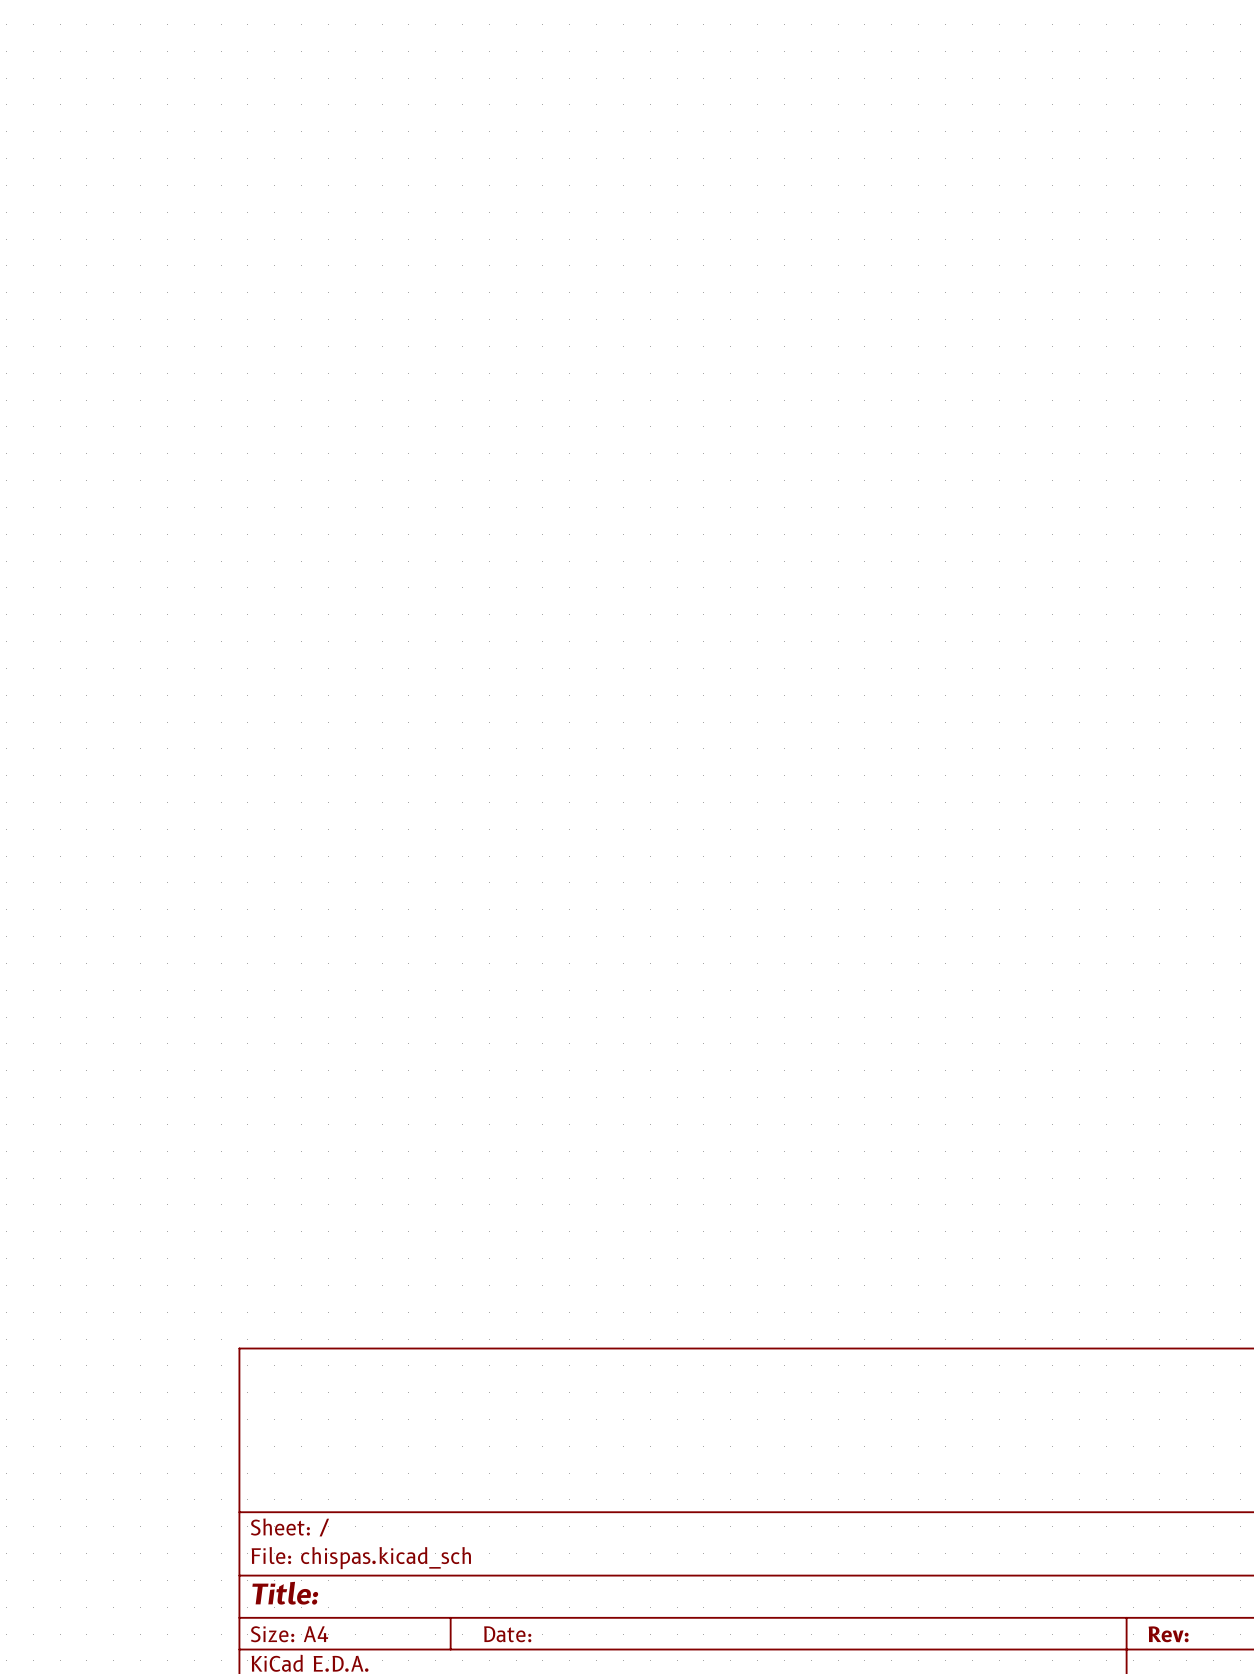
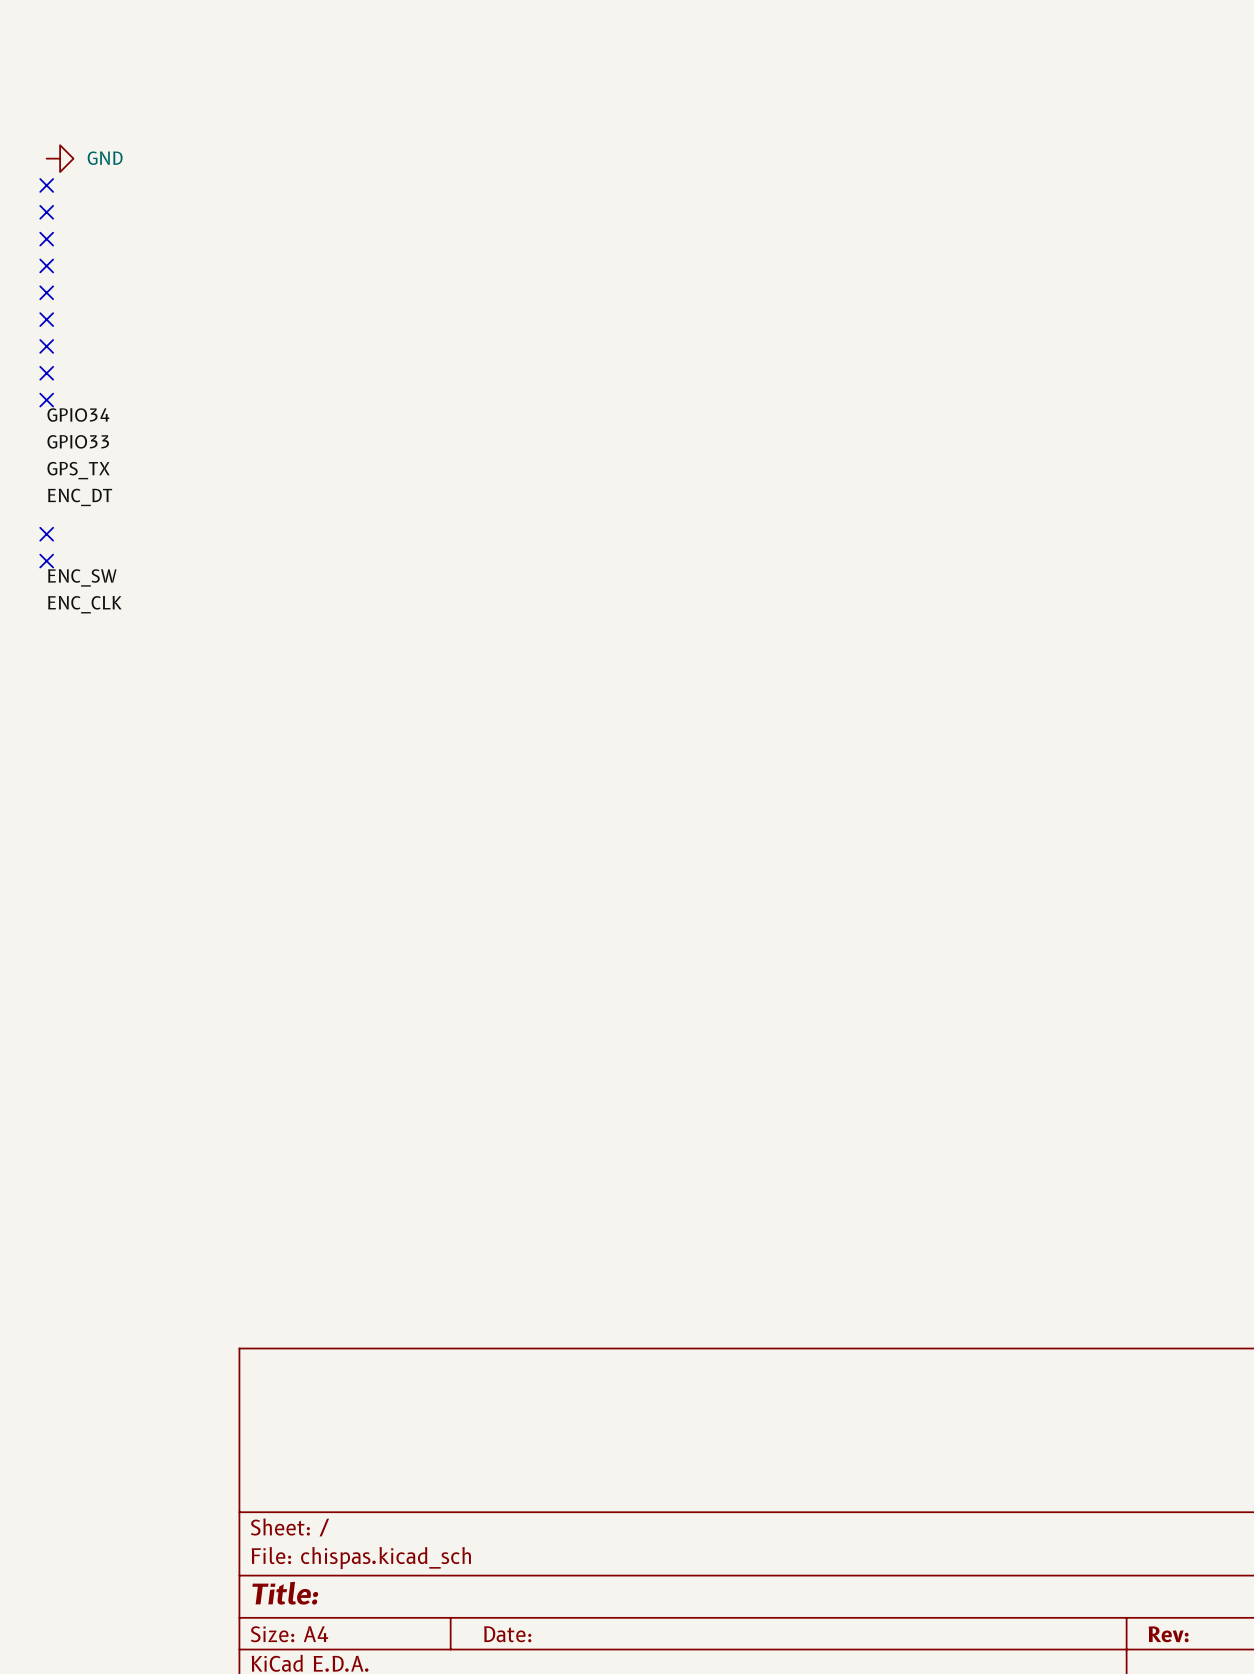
power symbol: none -> GND (60, 158)
no-connect mark: none -> (46, 185)
no-connect mark: none -> (46, 212)
no-connect mark: none -> (46, 239)
no-connect mark: none -> (46, 265)
no-connect mark: none -> (46, 292)
no-connect mark: none -> (46, 319)
no-connect mark: none -> (46, 346)
no-connect mark: none -> (46, 373)
no-connect mark: none -> (46, 400)
label: none -> GPIO34 (78, 415)
label: none -> GPIO33 (78, 441)
label: none -> GPS_TX (78, 470)
label: none -> ENC_DT (80, 497)
no-connect mark: none -> (46, 534)
no-connect mark: none -> (46, 561)
label: none -> ENC_SW (82, 577)
label: none -> ENC_CLK (84, 604)

